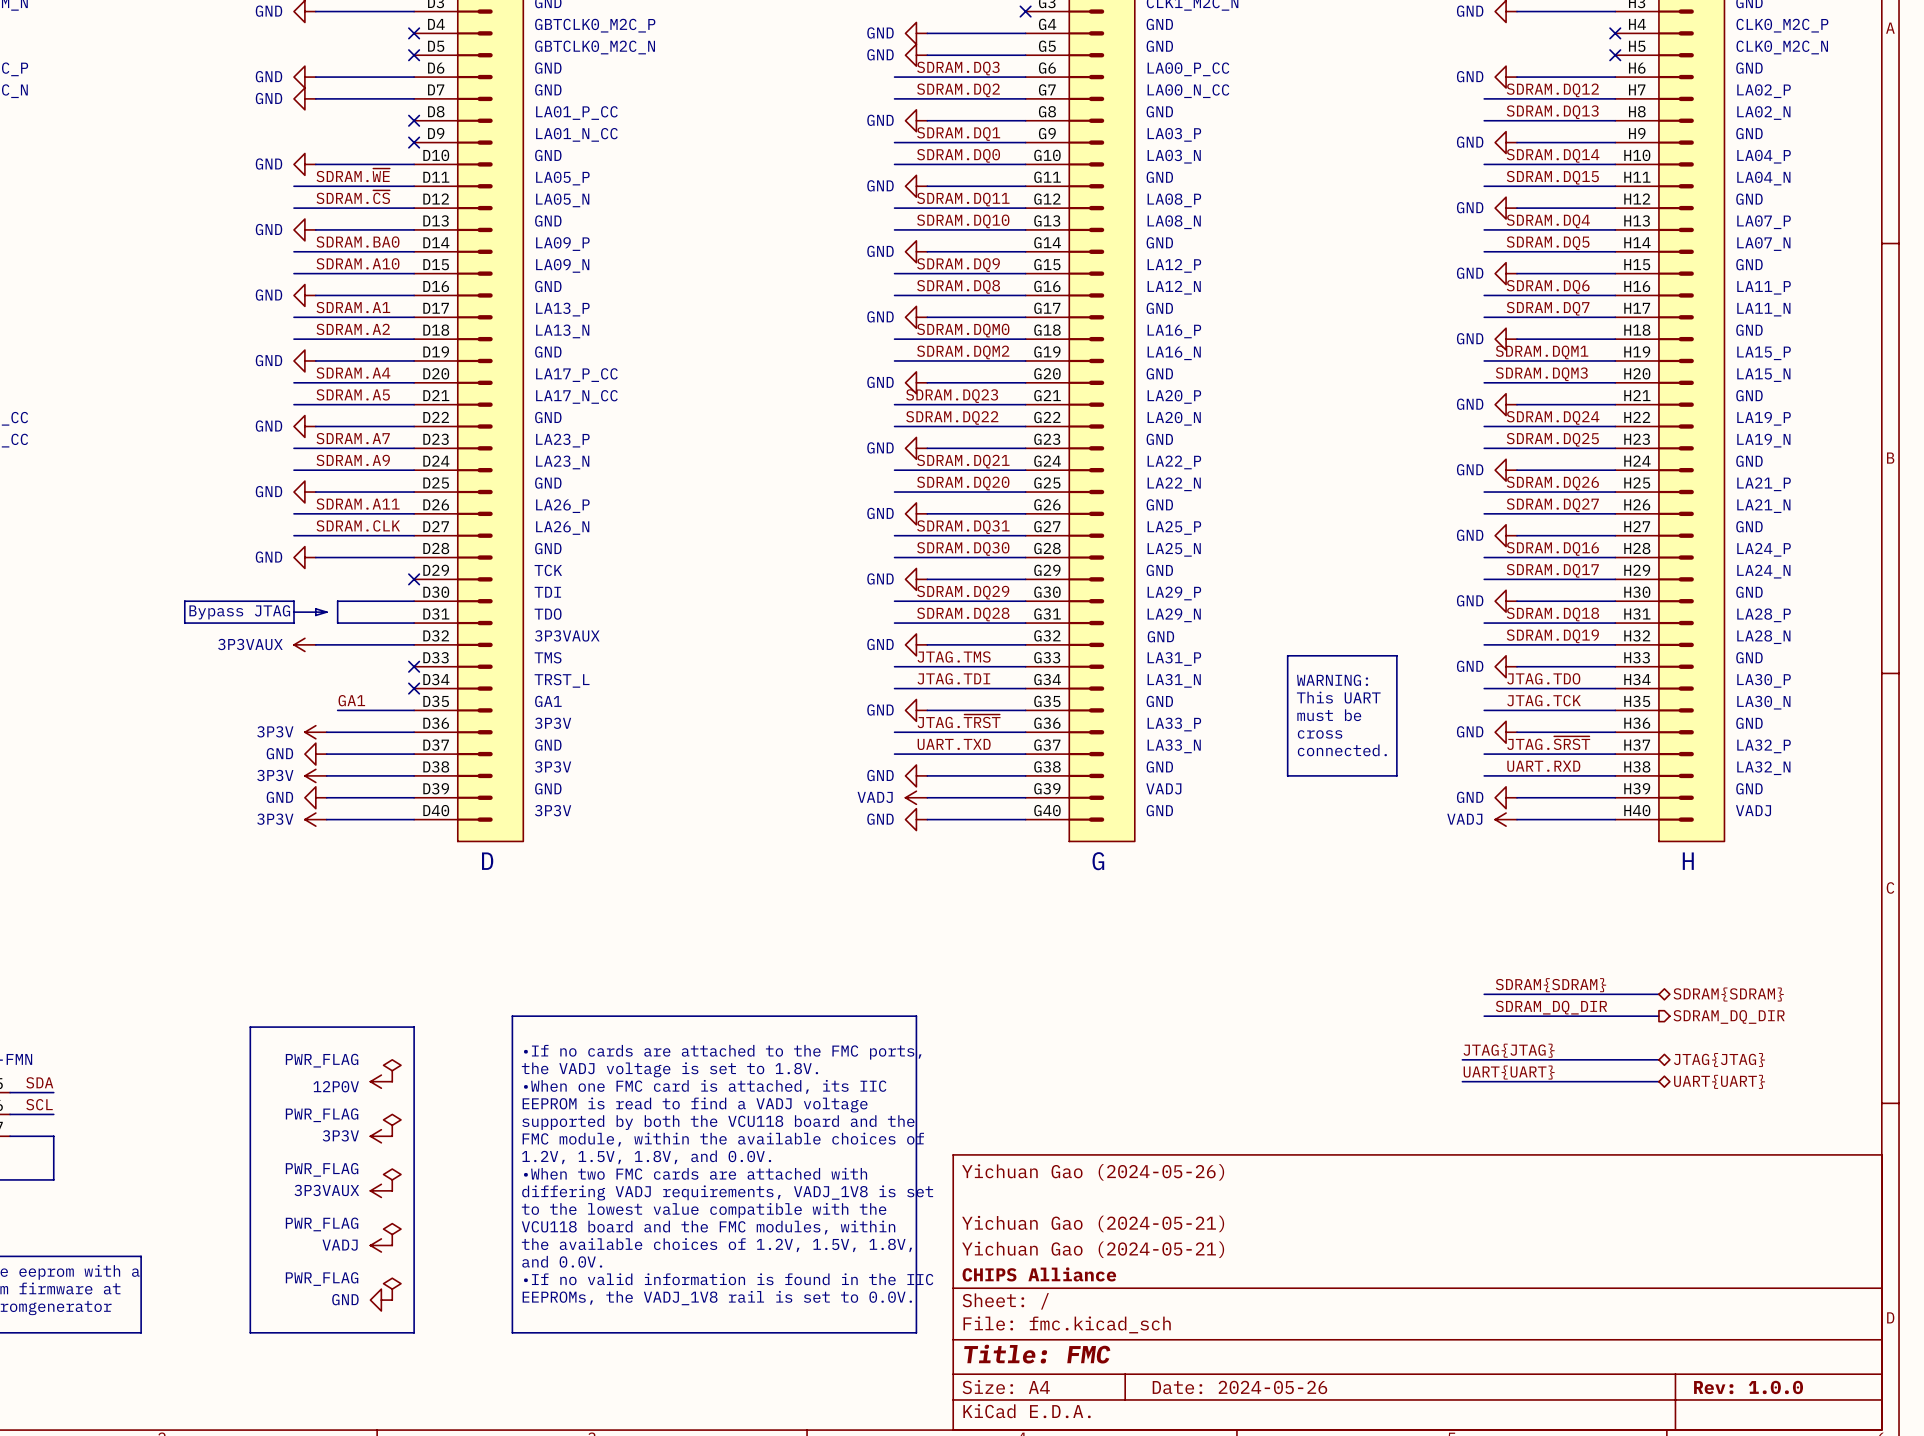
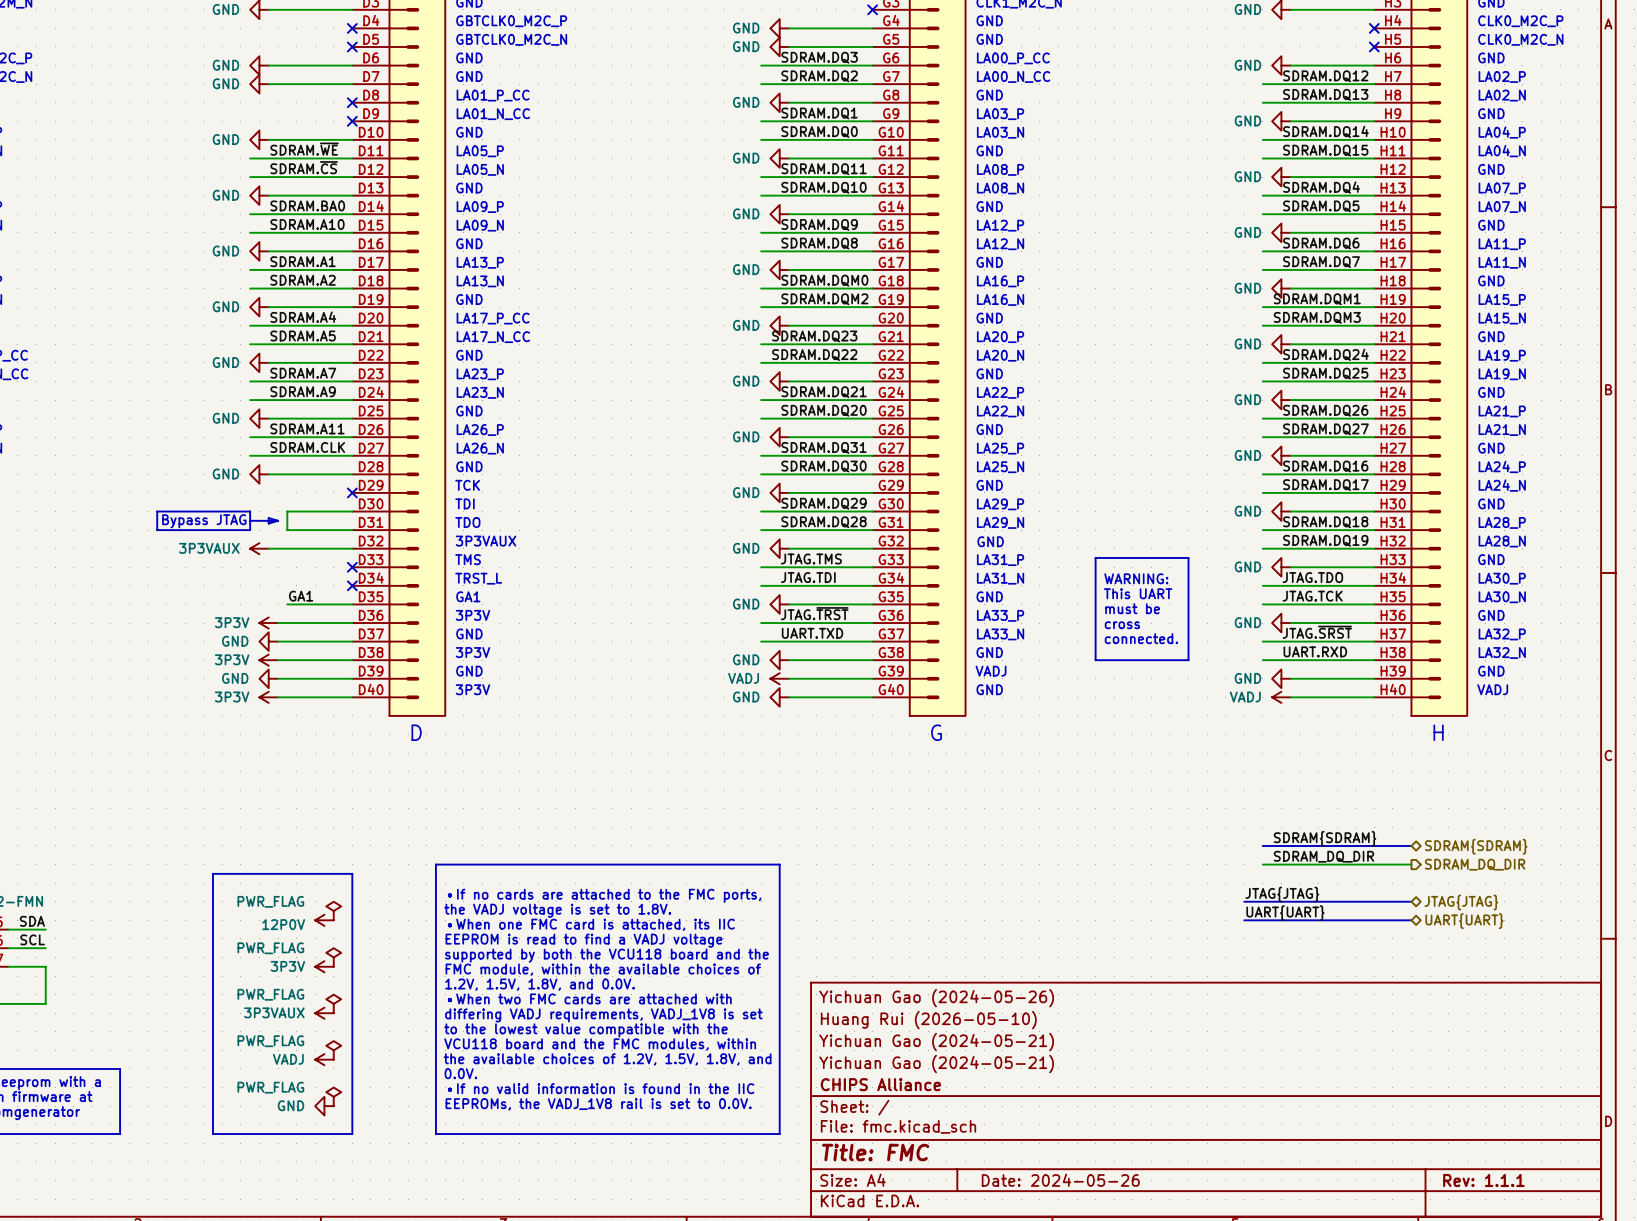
title block: none -> Huang Rui (2026-05-10) (928, 1020)
text: the available choices of 1.2V, 1.5V, 1.8V, (716, 1245) -> the available choices of 1.2V, 1.5V, 1.8V, and (607, 1059)
text: and 0.0V. (562, 1261) -> 0.0V. (460, 1073)
title block: Rev: 1.0.0 (1748, 1387) -> Rev: 1.1.1 (1483, 1180)

